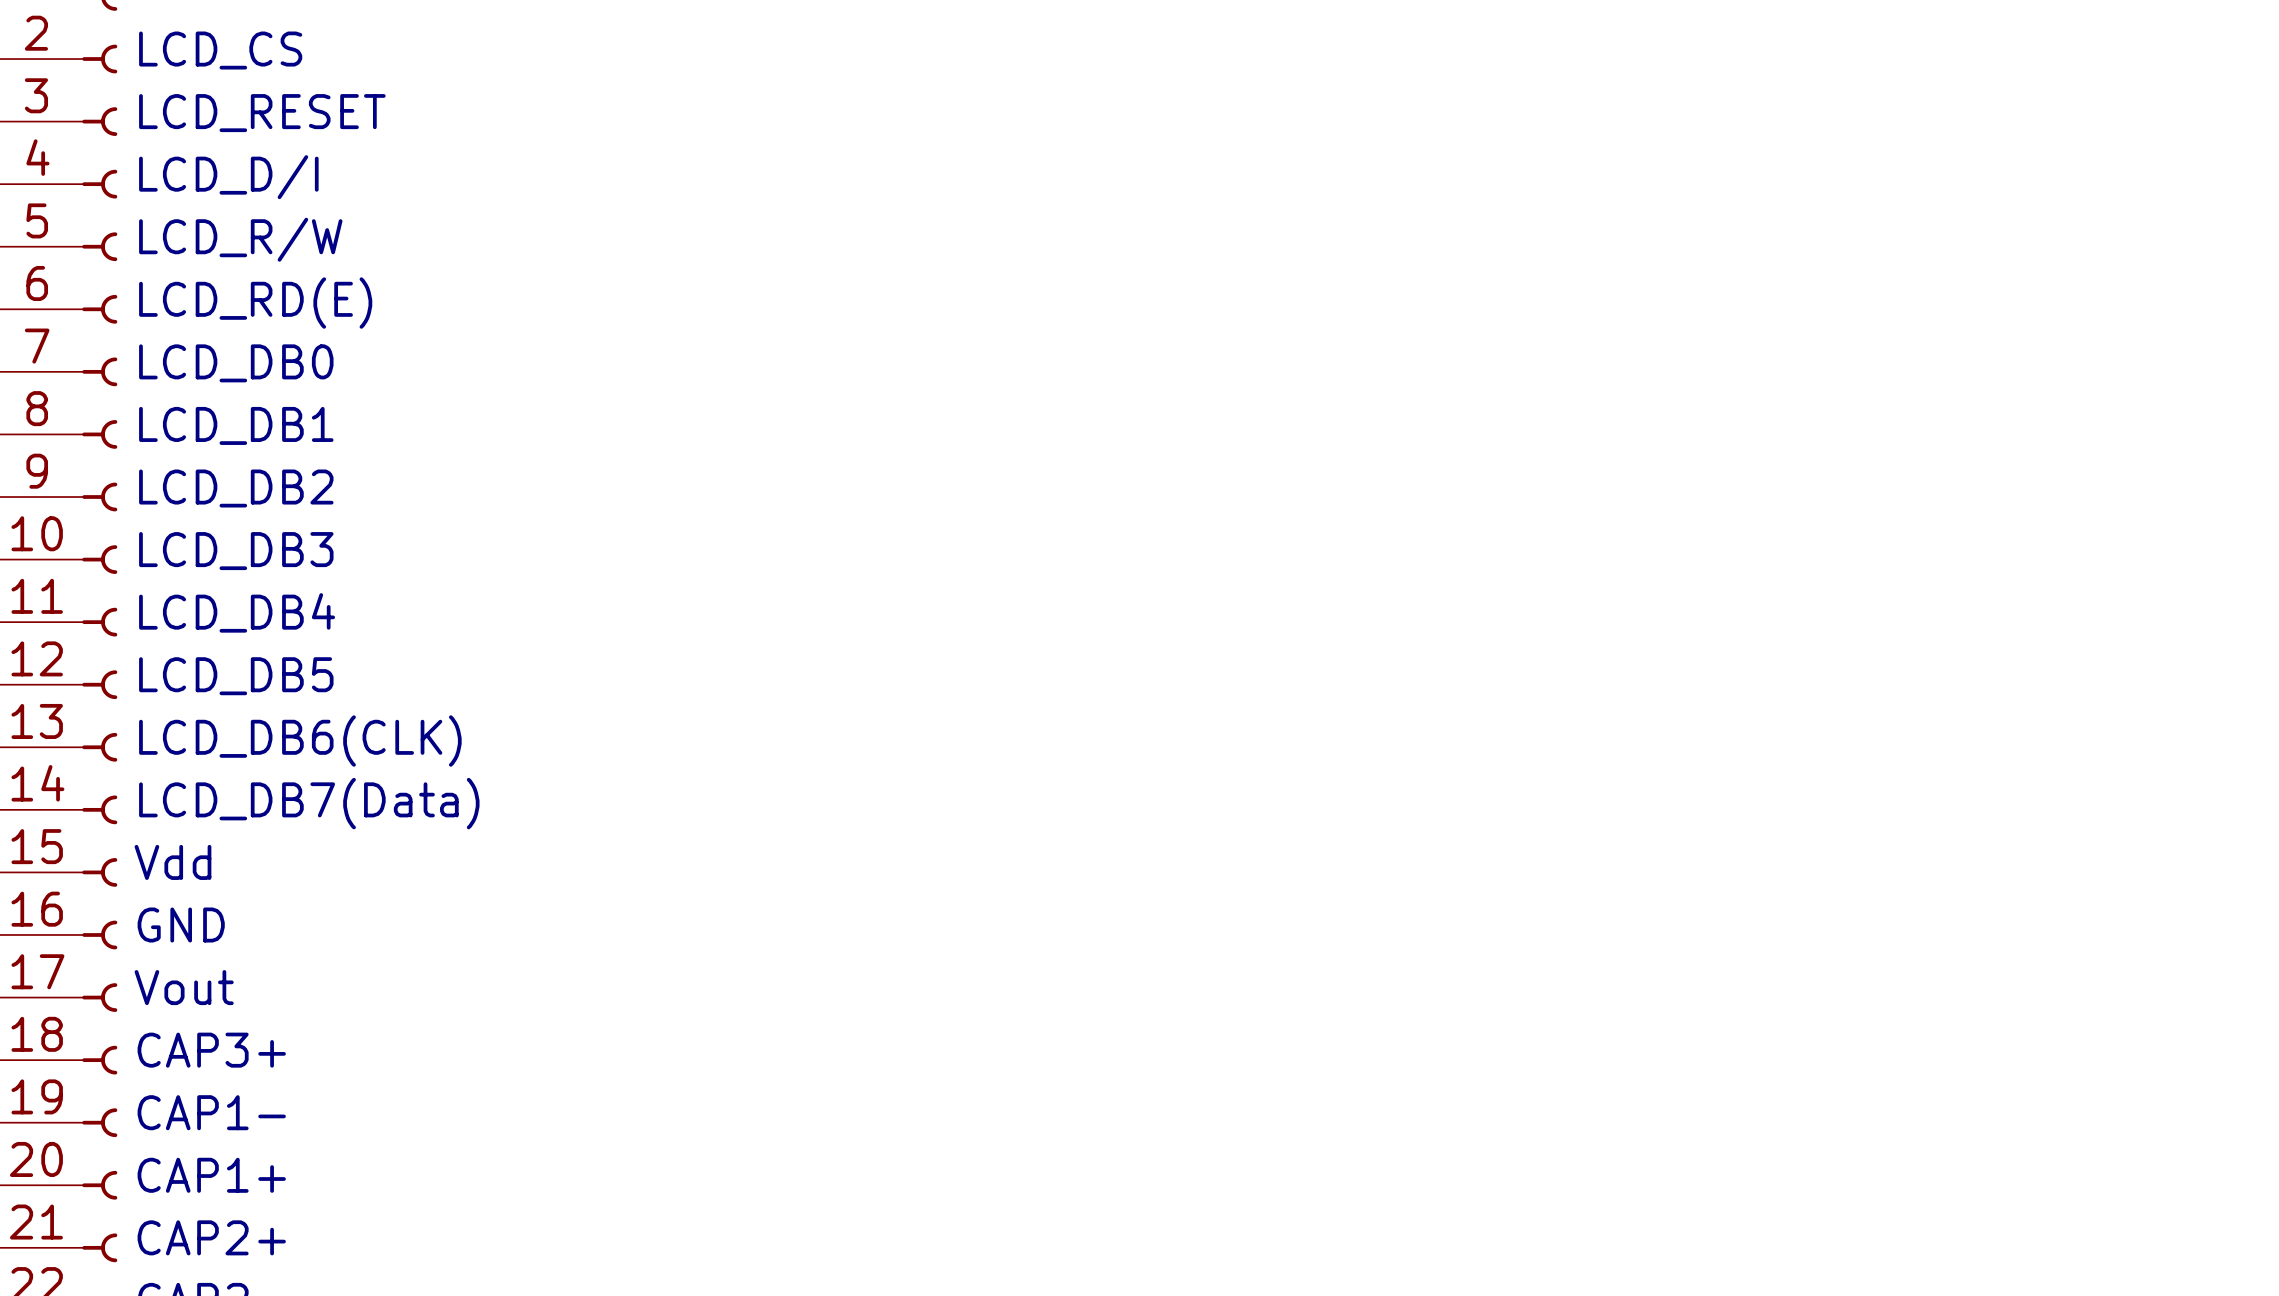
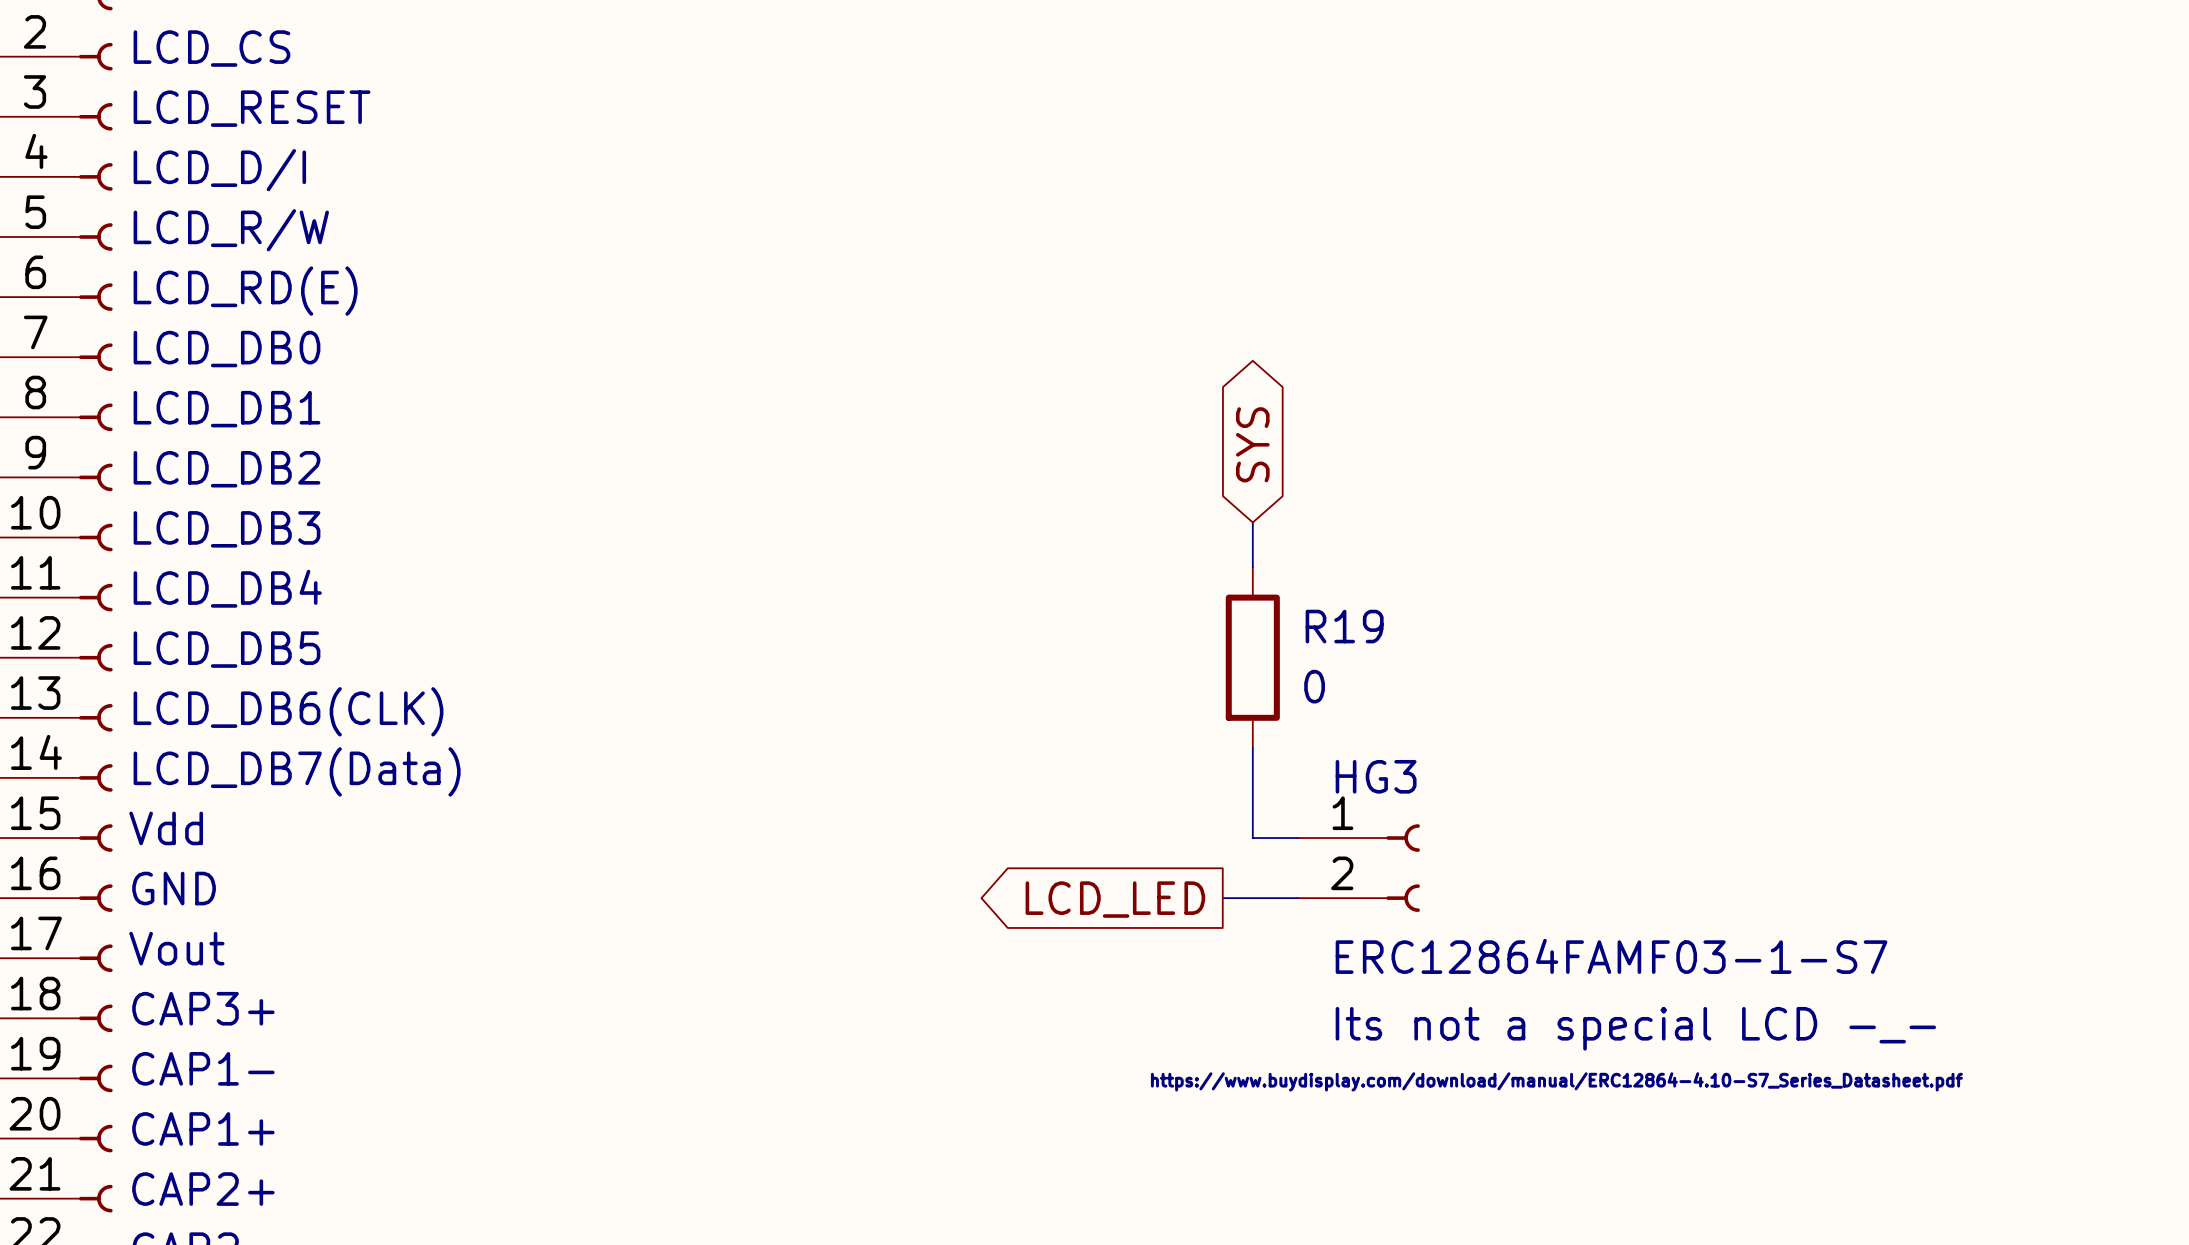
global label: none -> SYS (1252, 444)
wire: none -> (1252, 522) (1252, 567)
R19: none -> 0 (1252, 657)
wire: none -> (1252, 747) (1252, 838) (1297, 838)
HG3: none -> ERC12864FAMF03-1-S7 (1358, 868)
wire: none -> (1222, 898) (1297, 898)
global label: none -> LCD_LED (1115, 899)
text: none -> Its not a special LCD -_- (1635, 1028)
text: none -> https://www.buydisplay.com/download/manual/ERC12864-4.10-S7_Series_Datasheet.pdf (1556, 1081)

